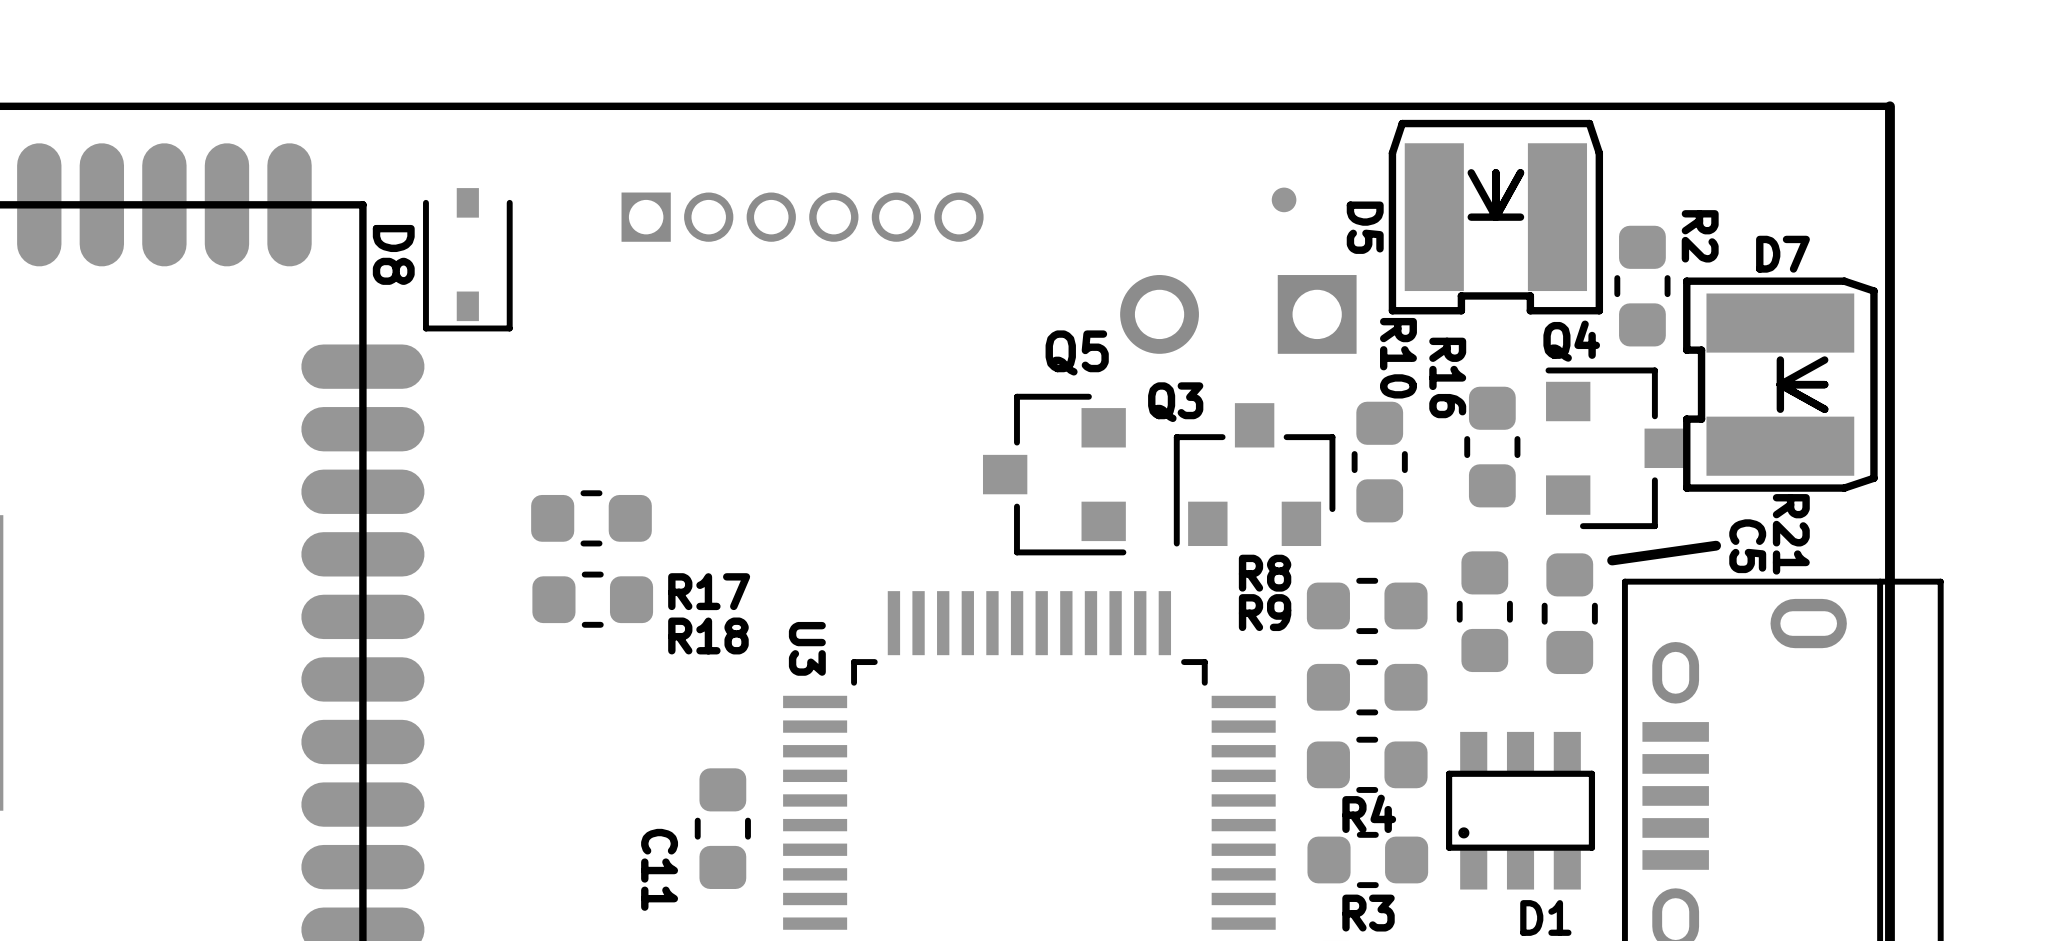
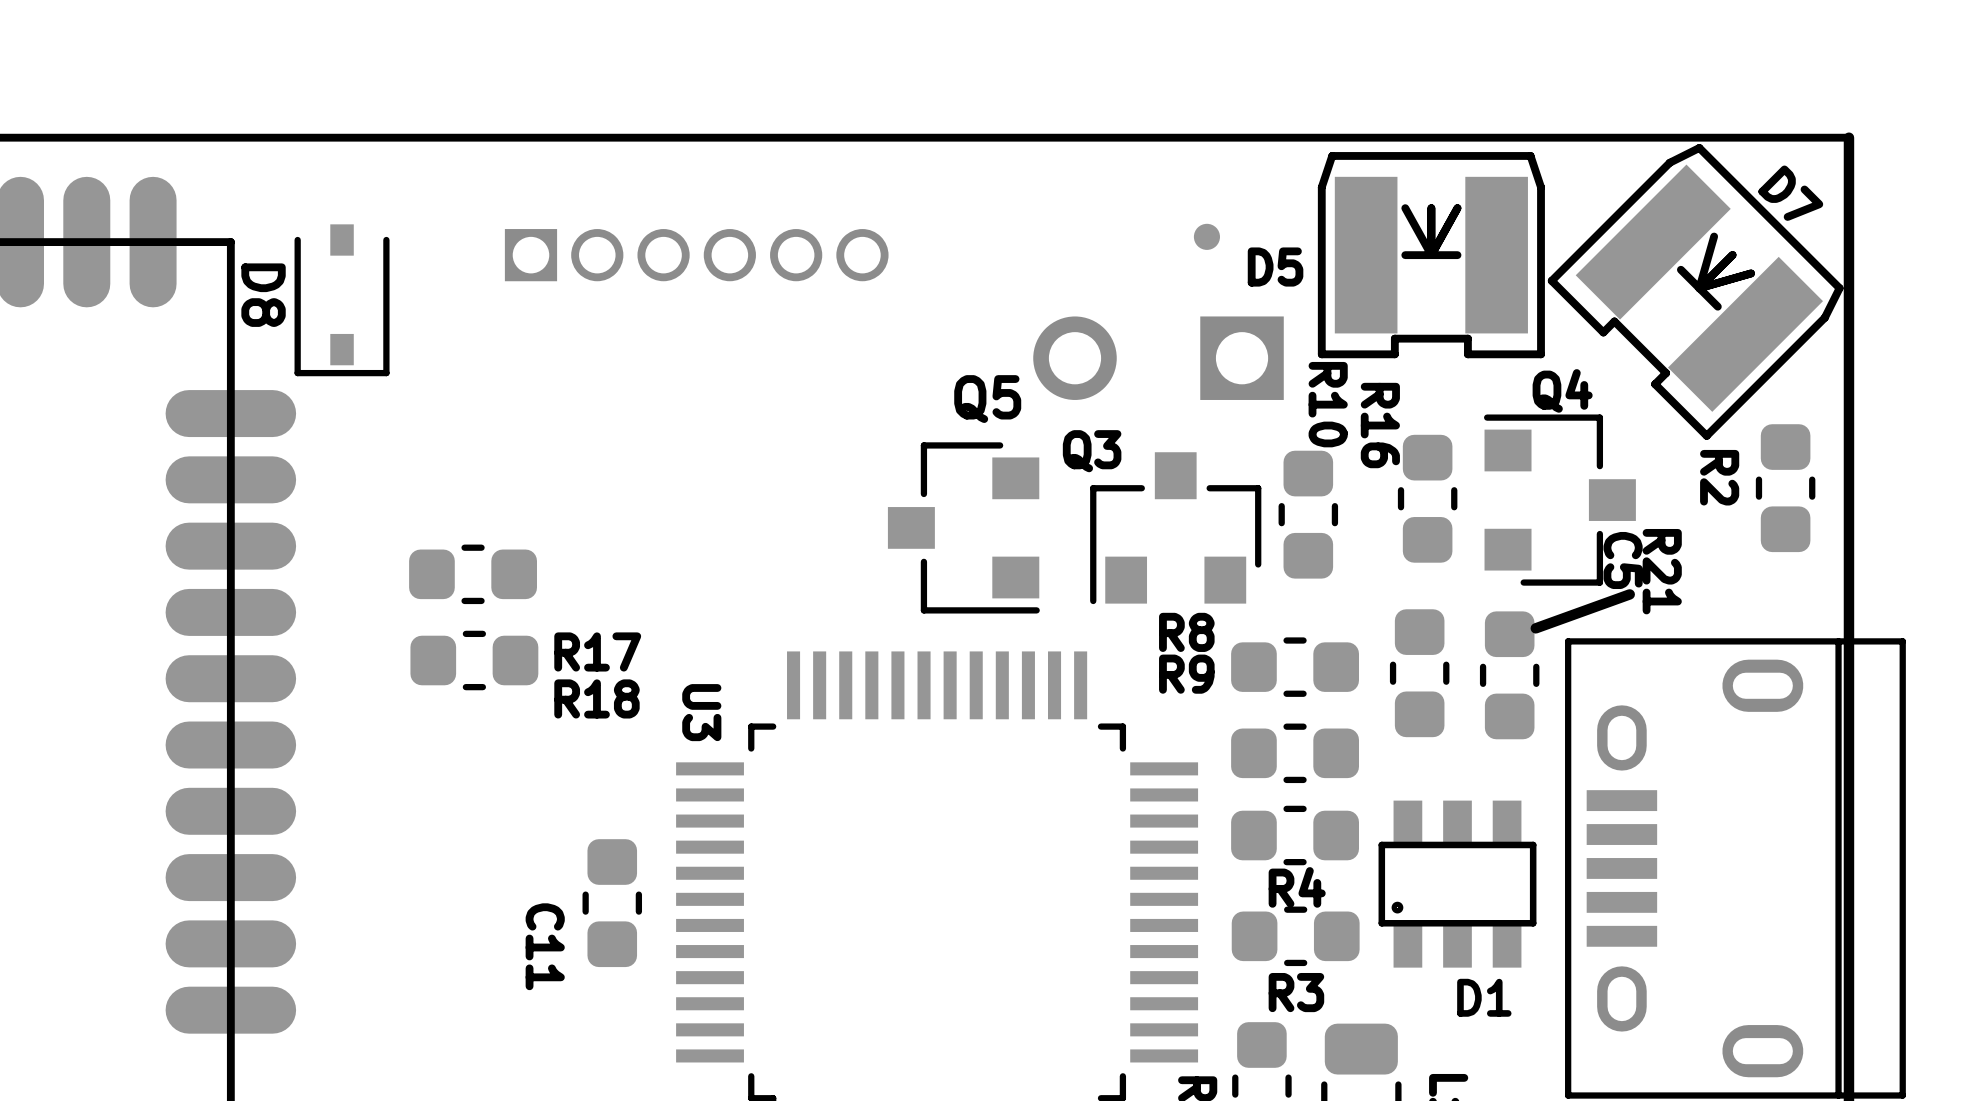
D5 name rotation: 0° (1365, 227) -> 90° counterclockwise (1275, 267)
R2 name position: R2 (1700, 236) -> R2 (1719, 477)
R2 position: (1642, 286) -> (1785, 488)
Q4 name position: Q4 (1571, 341) -> Q4 (1562, 390)
D7 rotation: 0° (1780, 384) -> 45° counterclockwise (1695, 291)
D7 position: (1780, 384) -> (1695, 291)
R21 name position: R21 (1791, 534) -> R21 (1662, 571)
line: none -> (1629, 594) (1535, 628)
line: (1716, 545) (1612, 560) -> none
C5 name position: C5 (1747, 546) -> C5 (1623, 560)

